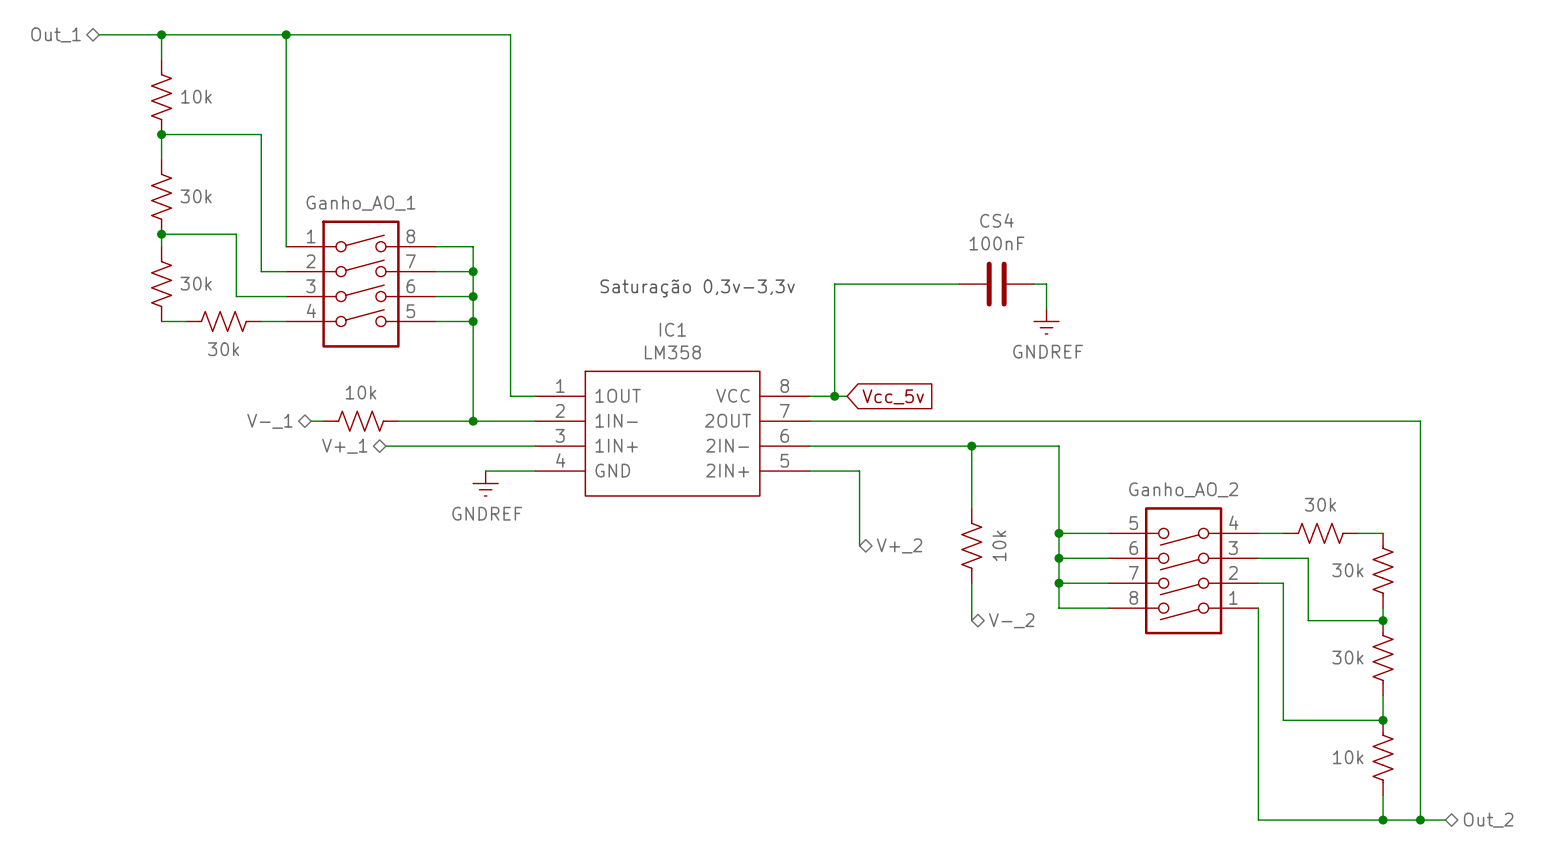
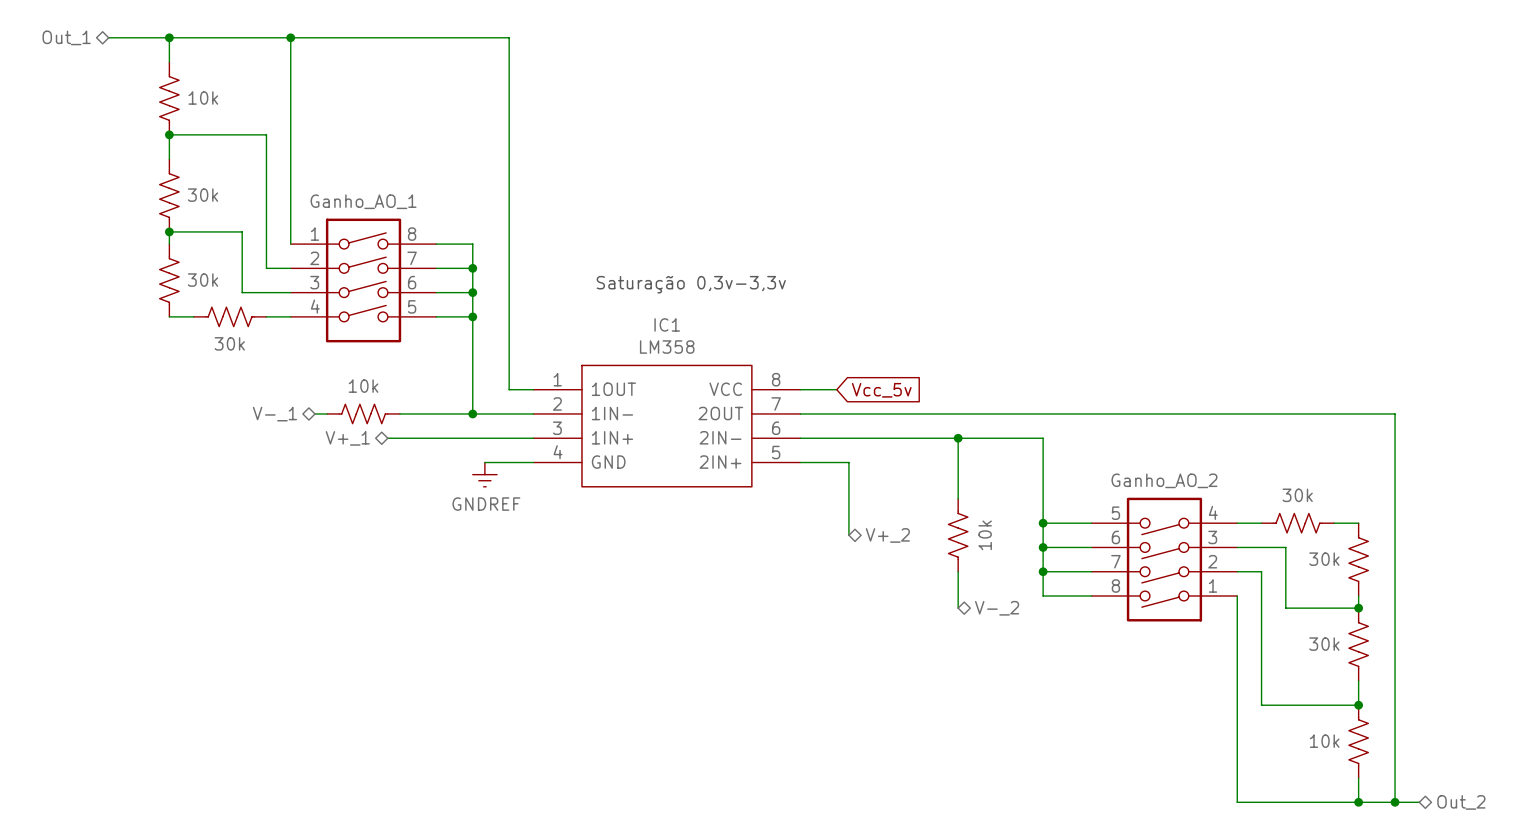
wire: (959, 284) (834, 284) (834, 396) -> none
CS4: 100nF (996, 284) -> none
wire: (1034, 284) (1046, 284) (1046, 309) -> none
power symbol: GNDREF (1046, 321) -> none
junction: (834, 396) -> none

